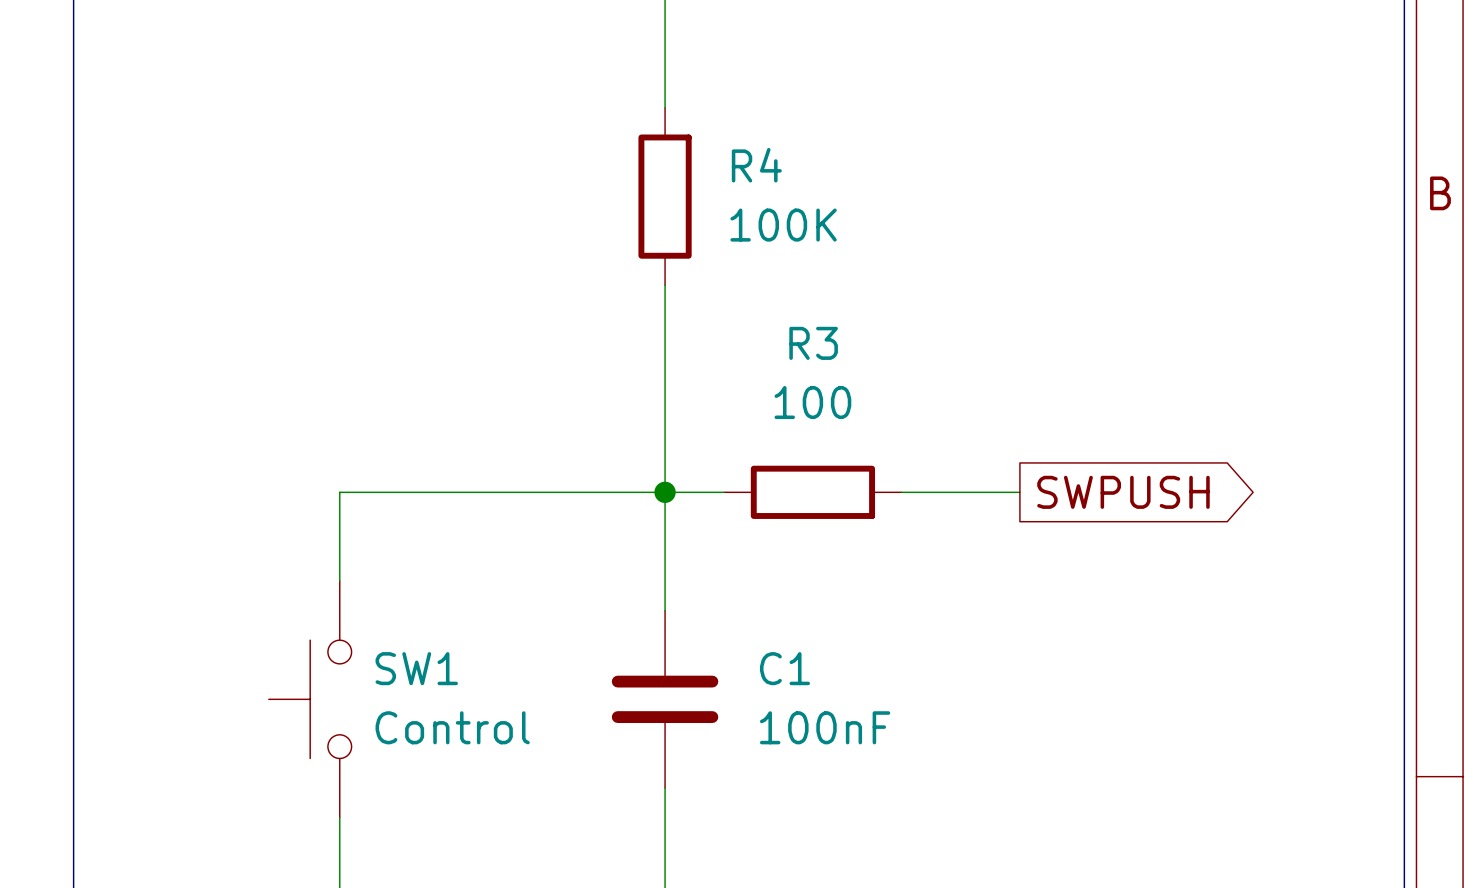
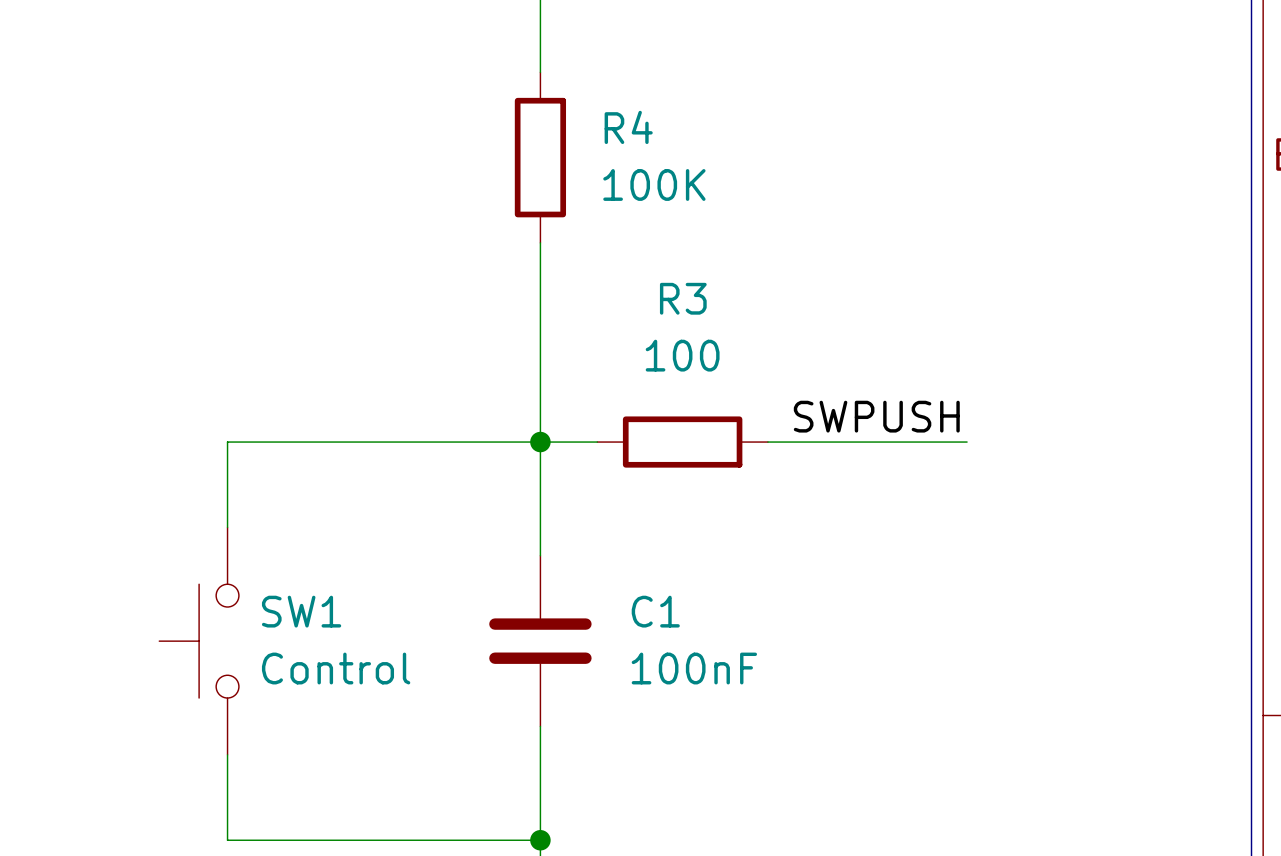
label: none -> SWPUSH (876, 416)
wire: none -> (881, 442) (967, 442)
global label: SWPUSH (1123, 492) -> none

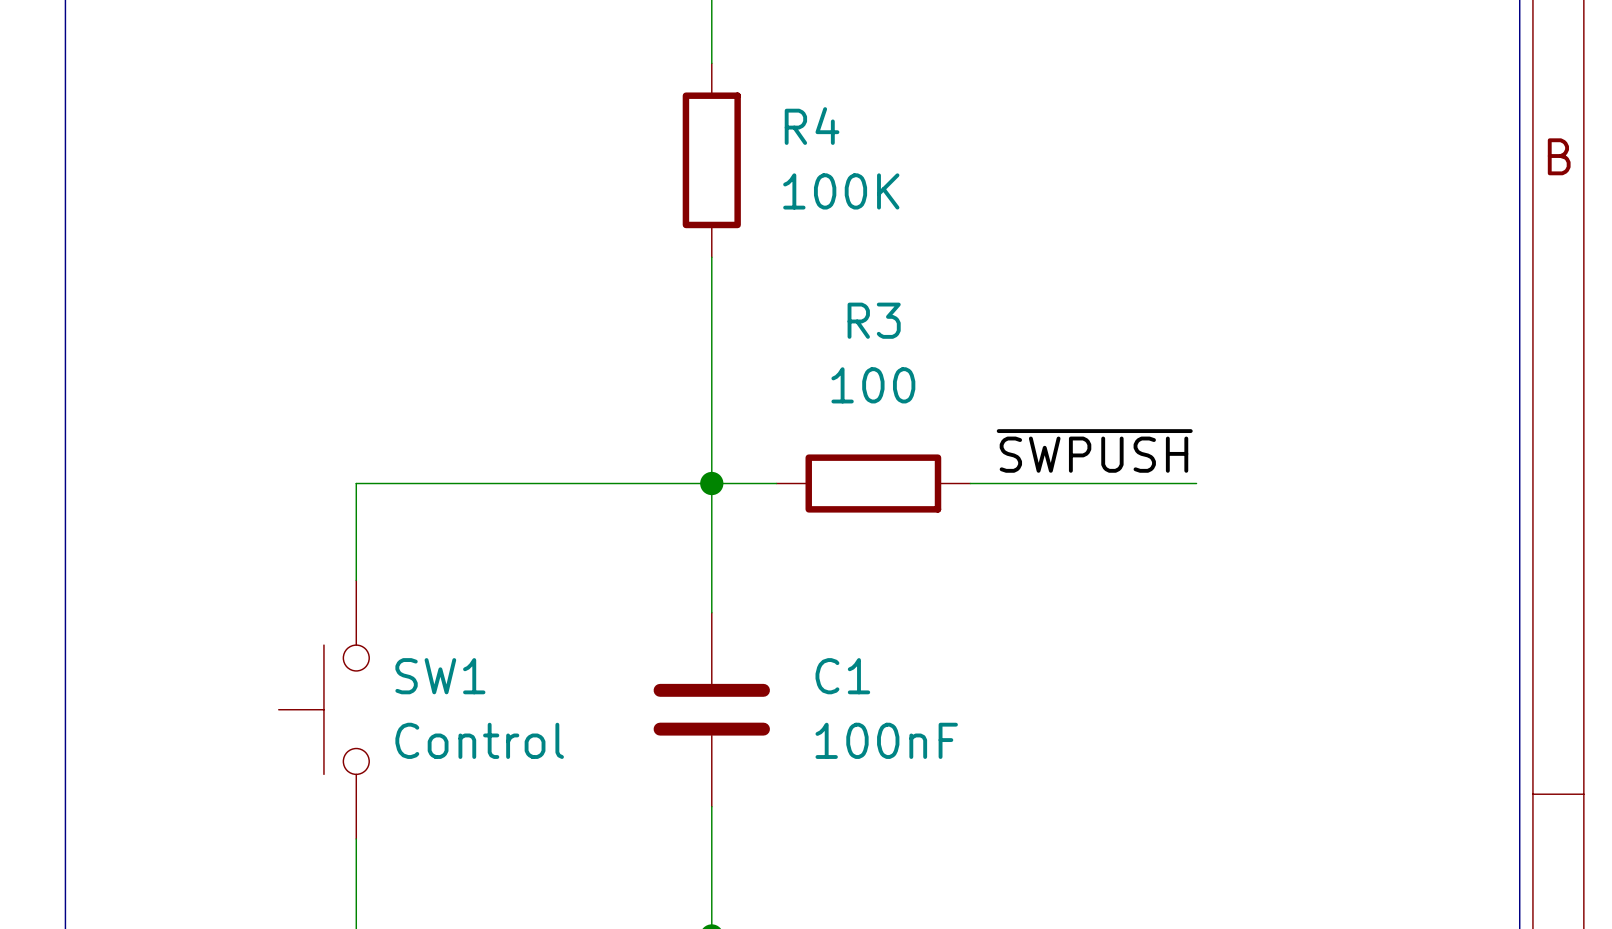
label: SWPUSH (876, 416) -> ~{SWPUSH} (1094, 450)

